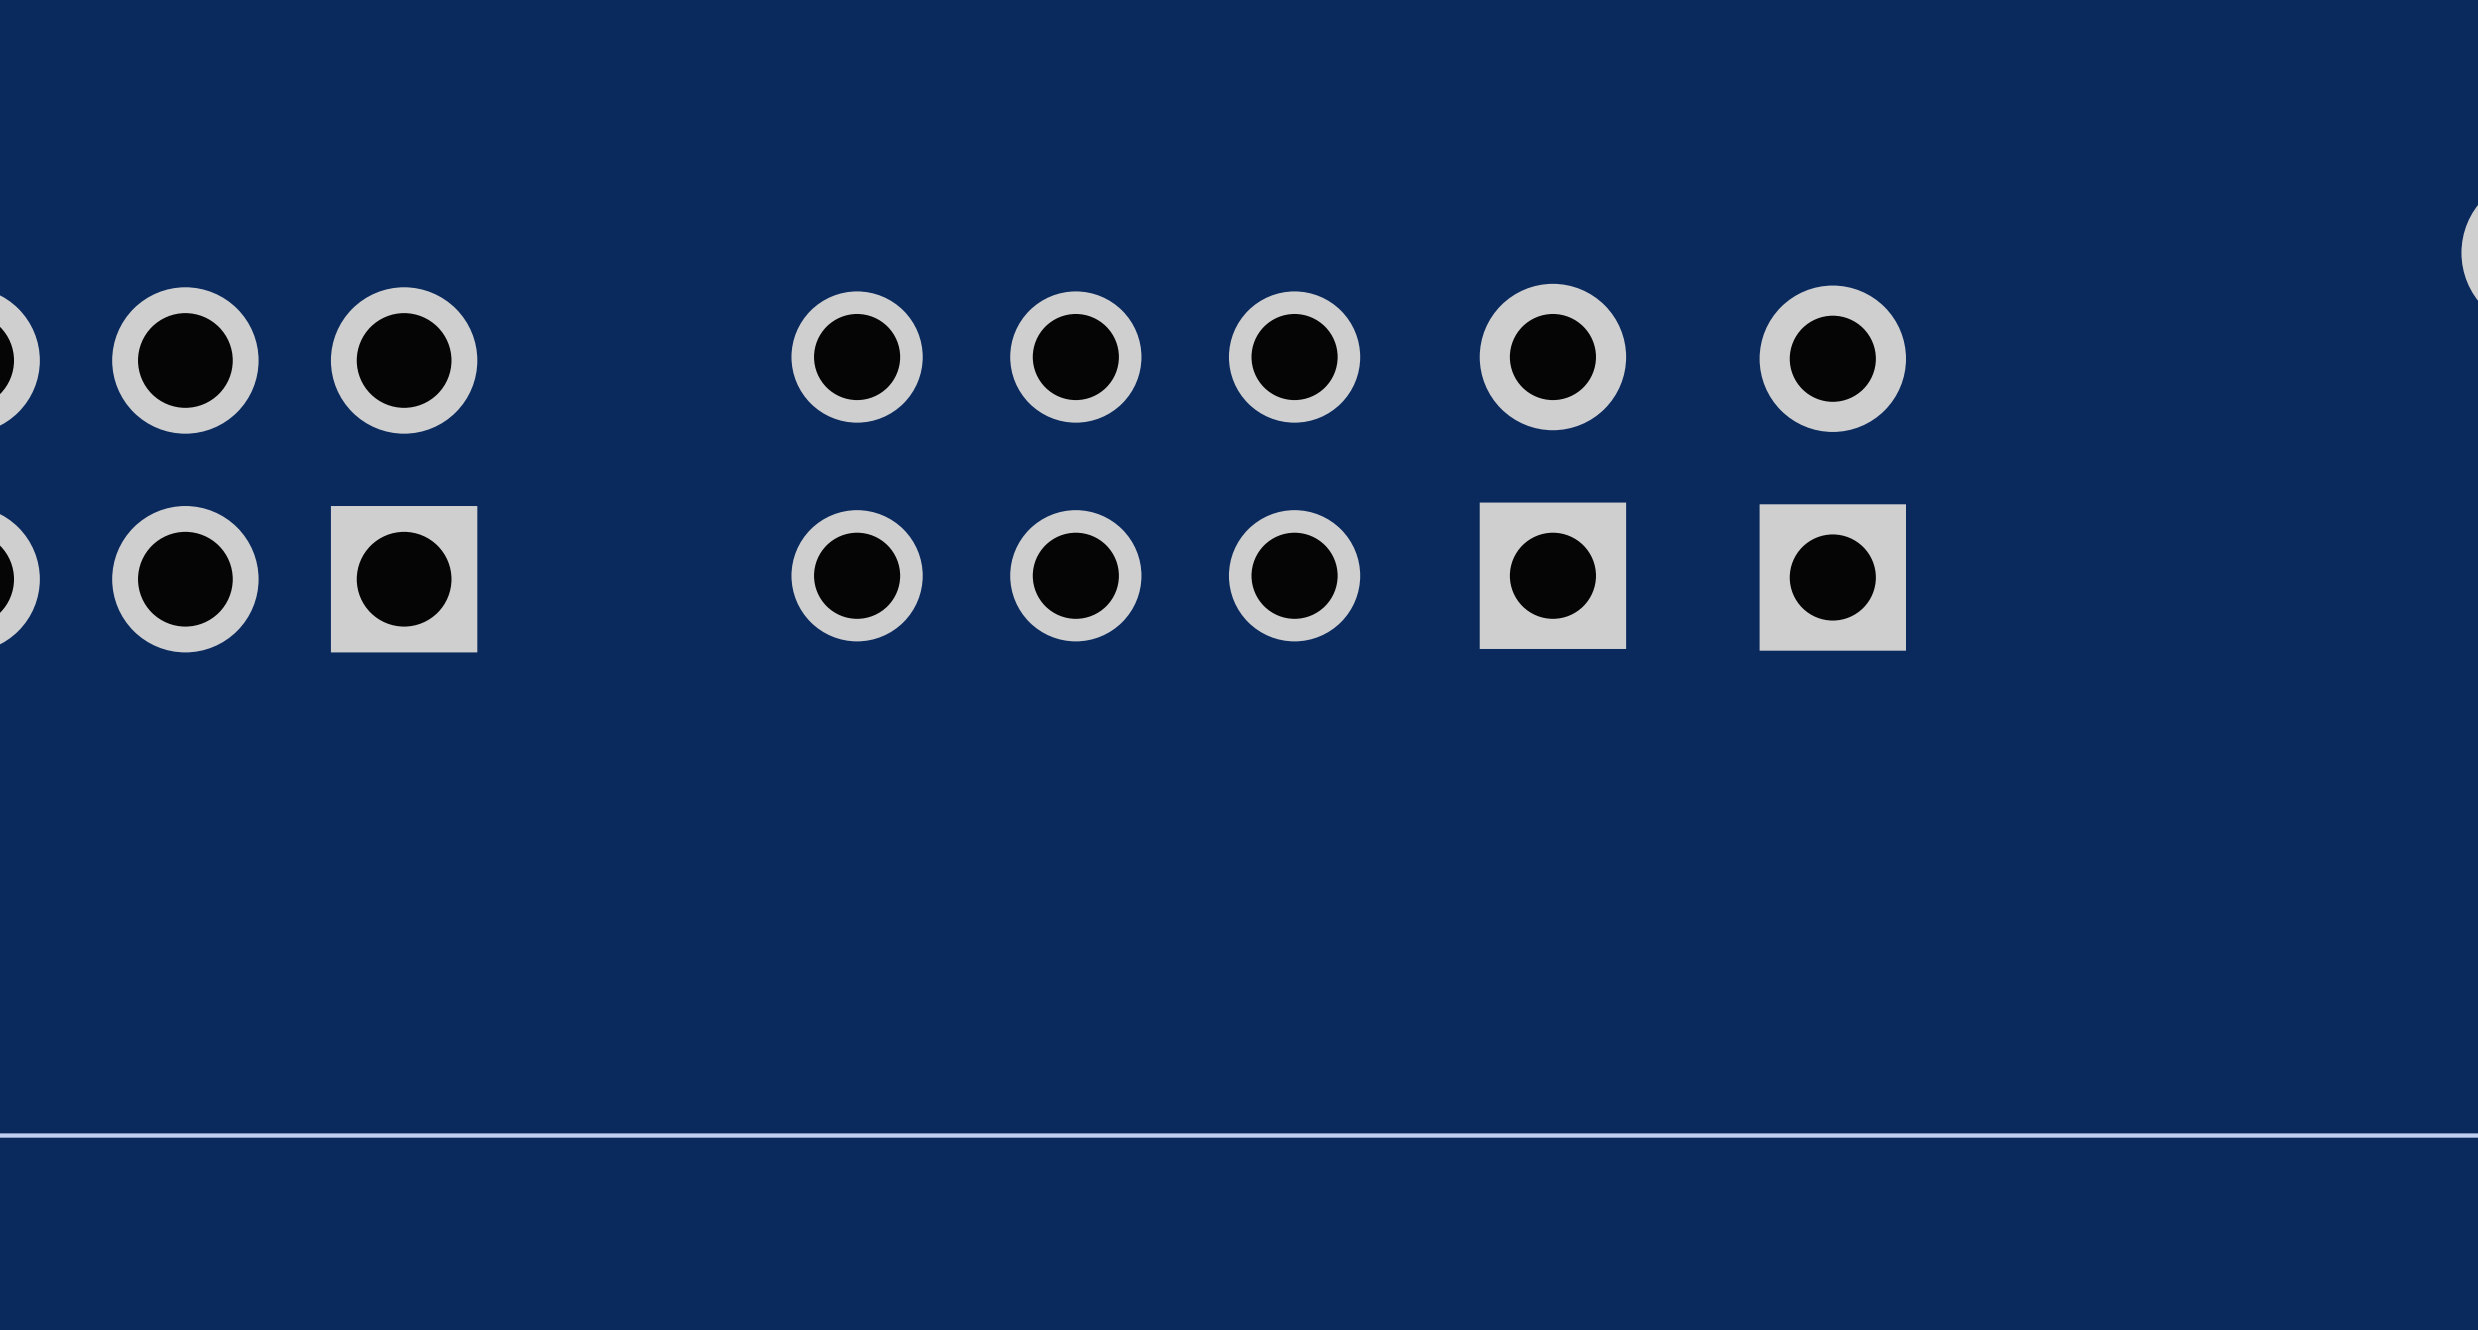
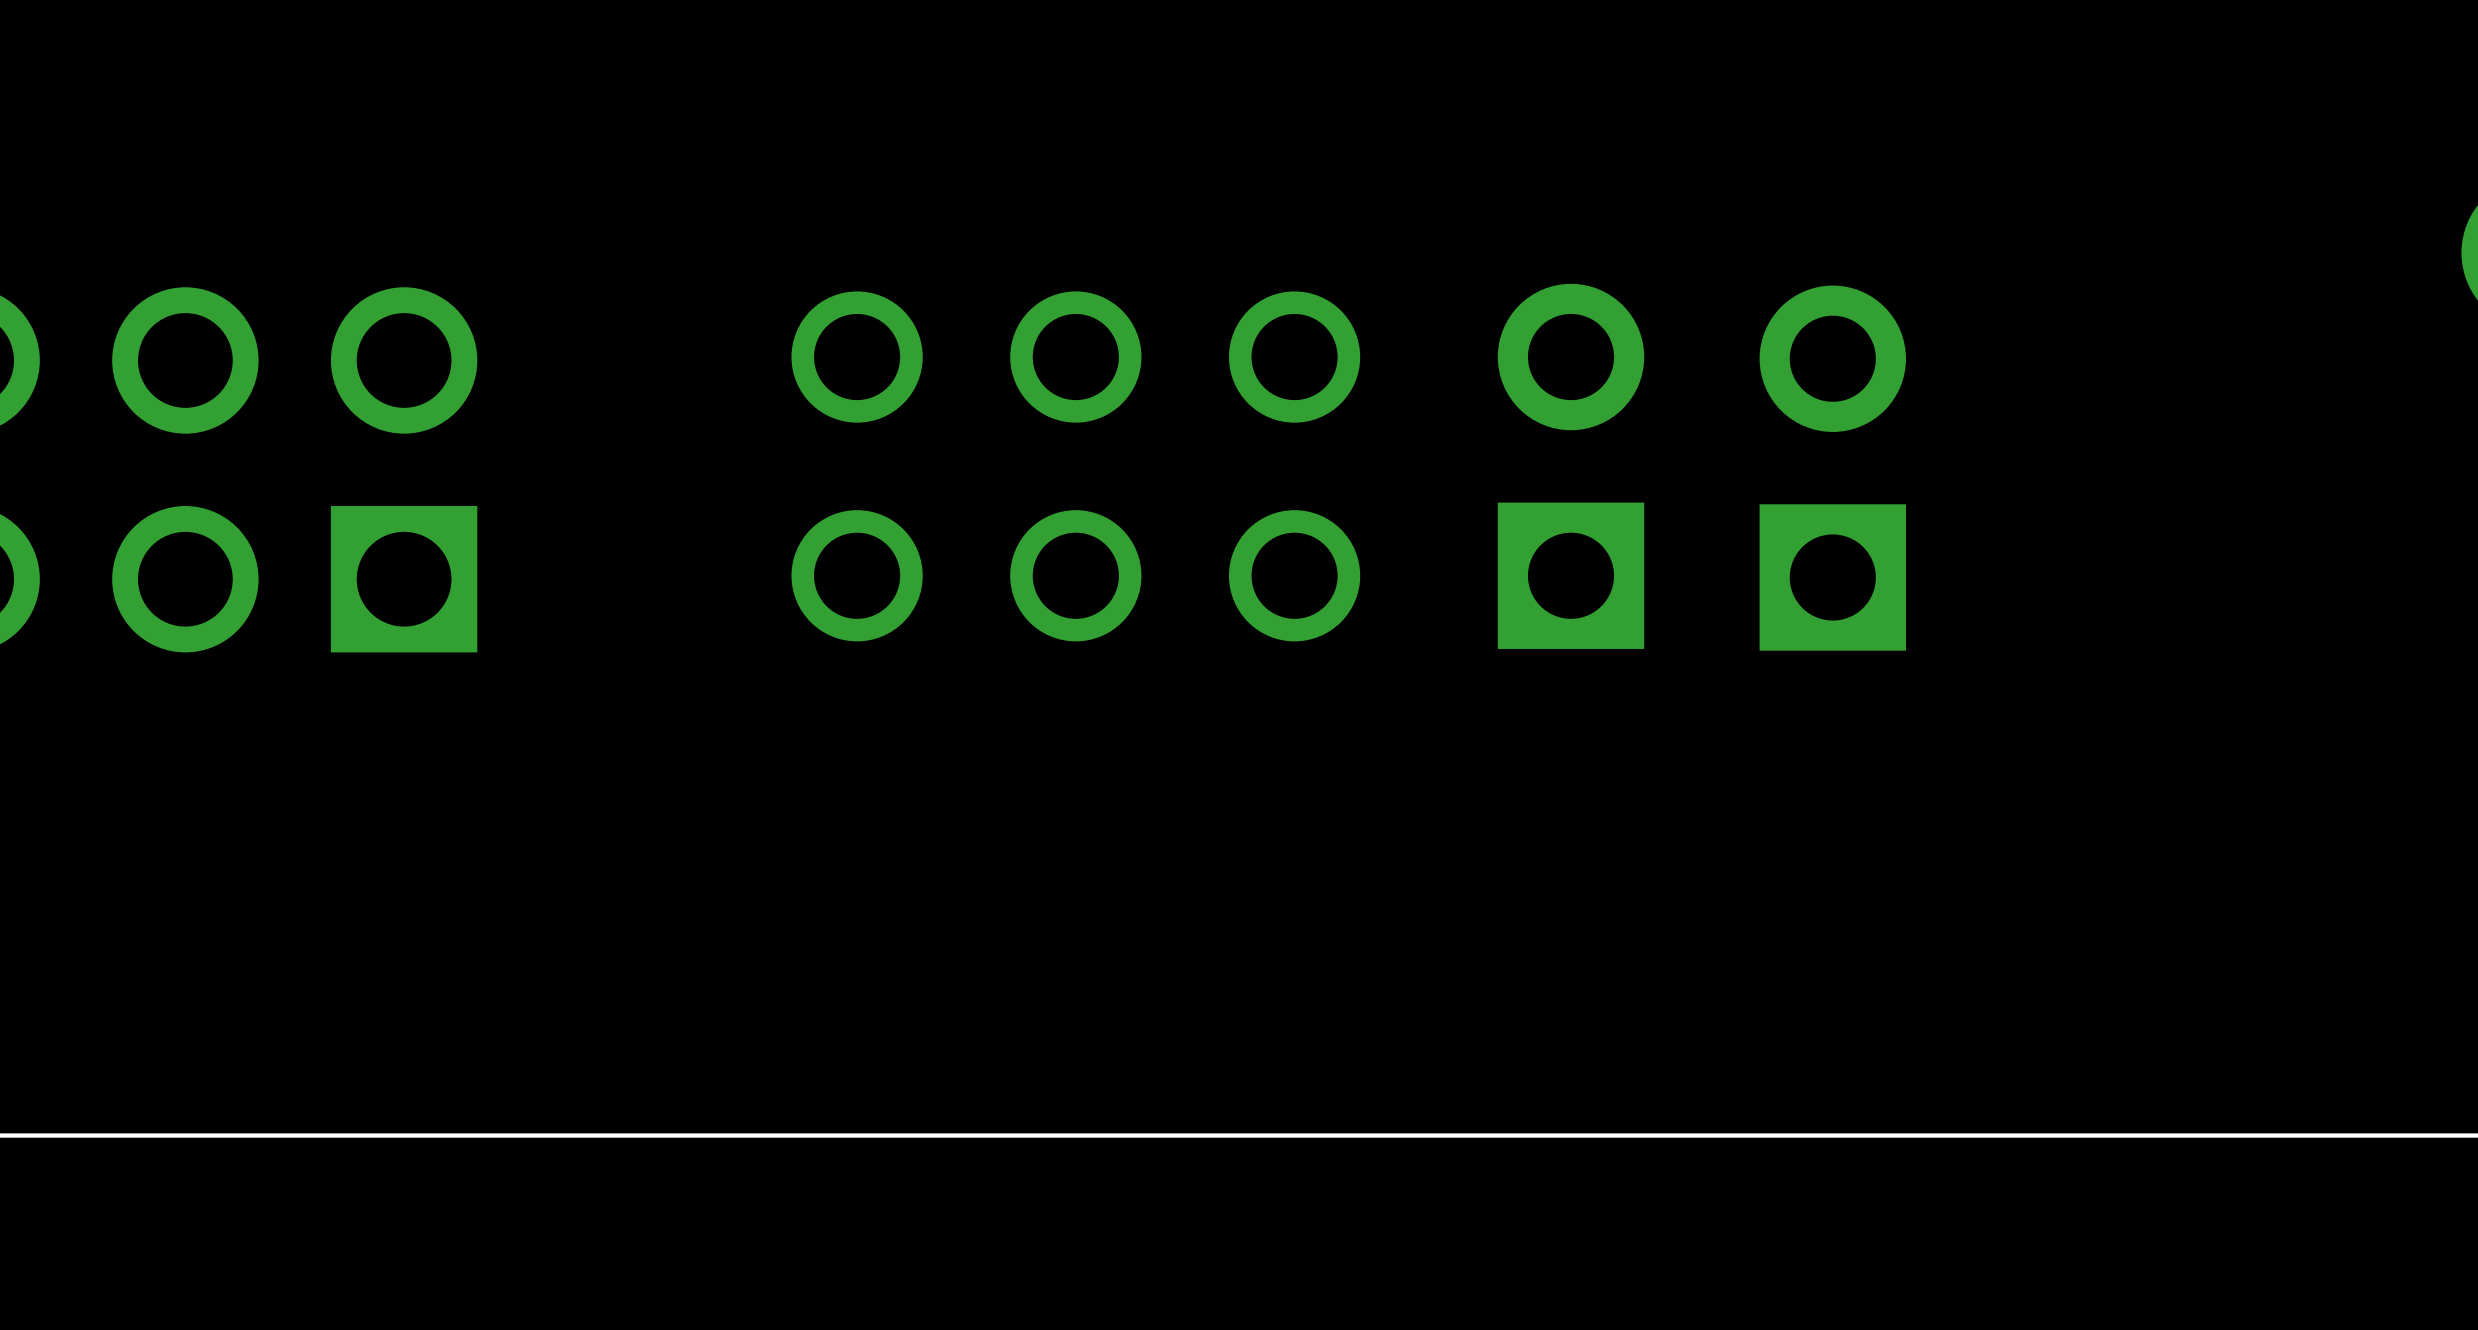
part position: (1552, 466) -> (1571, 466)

